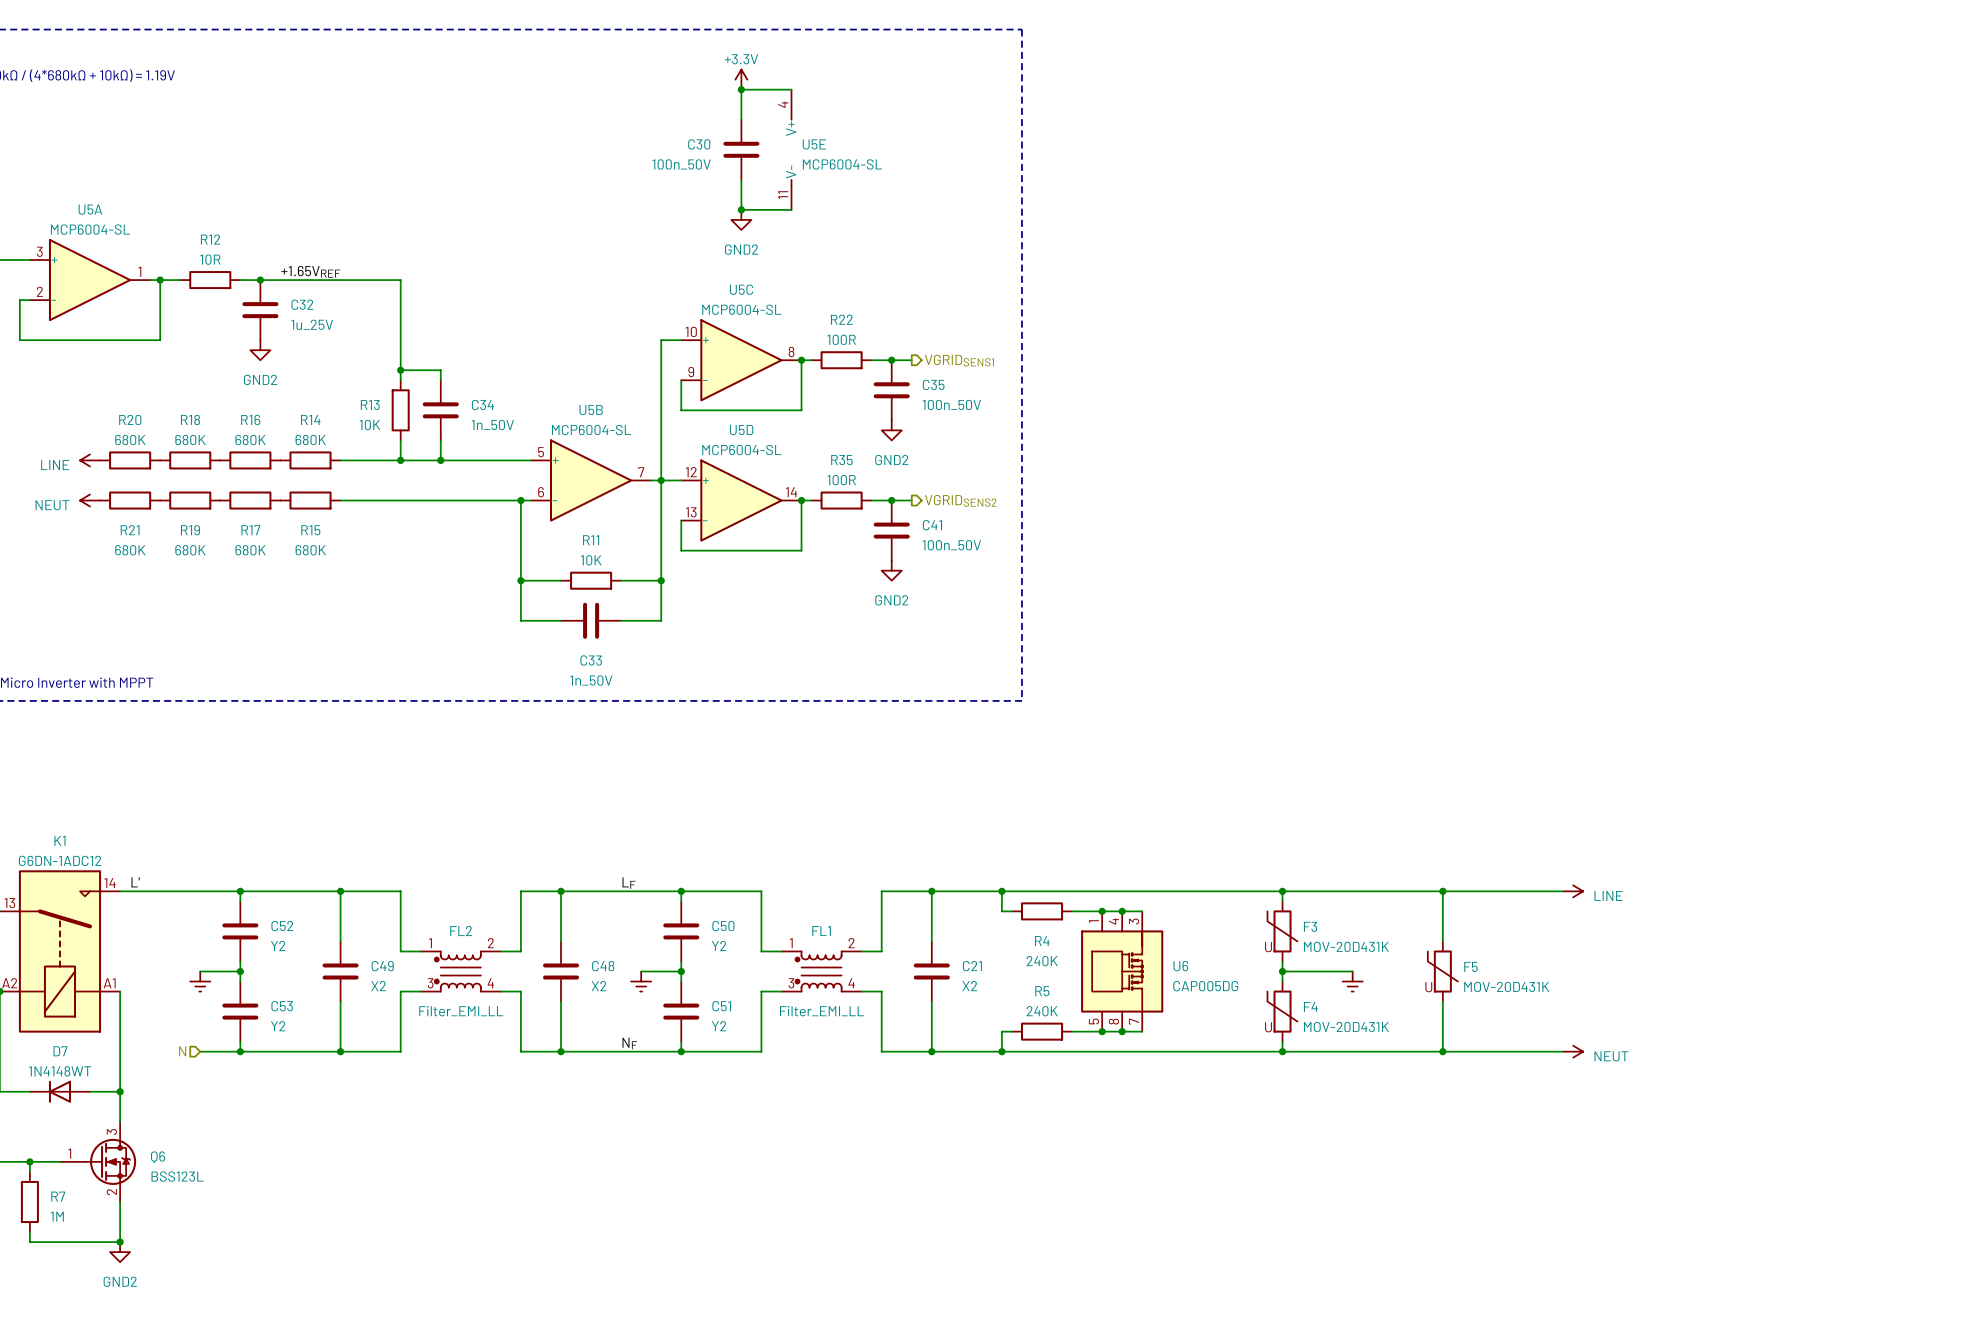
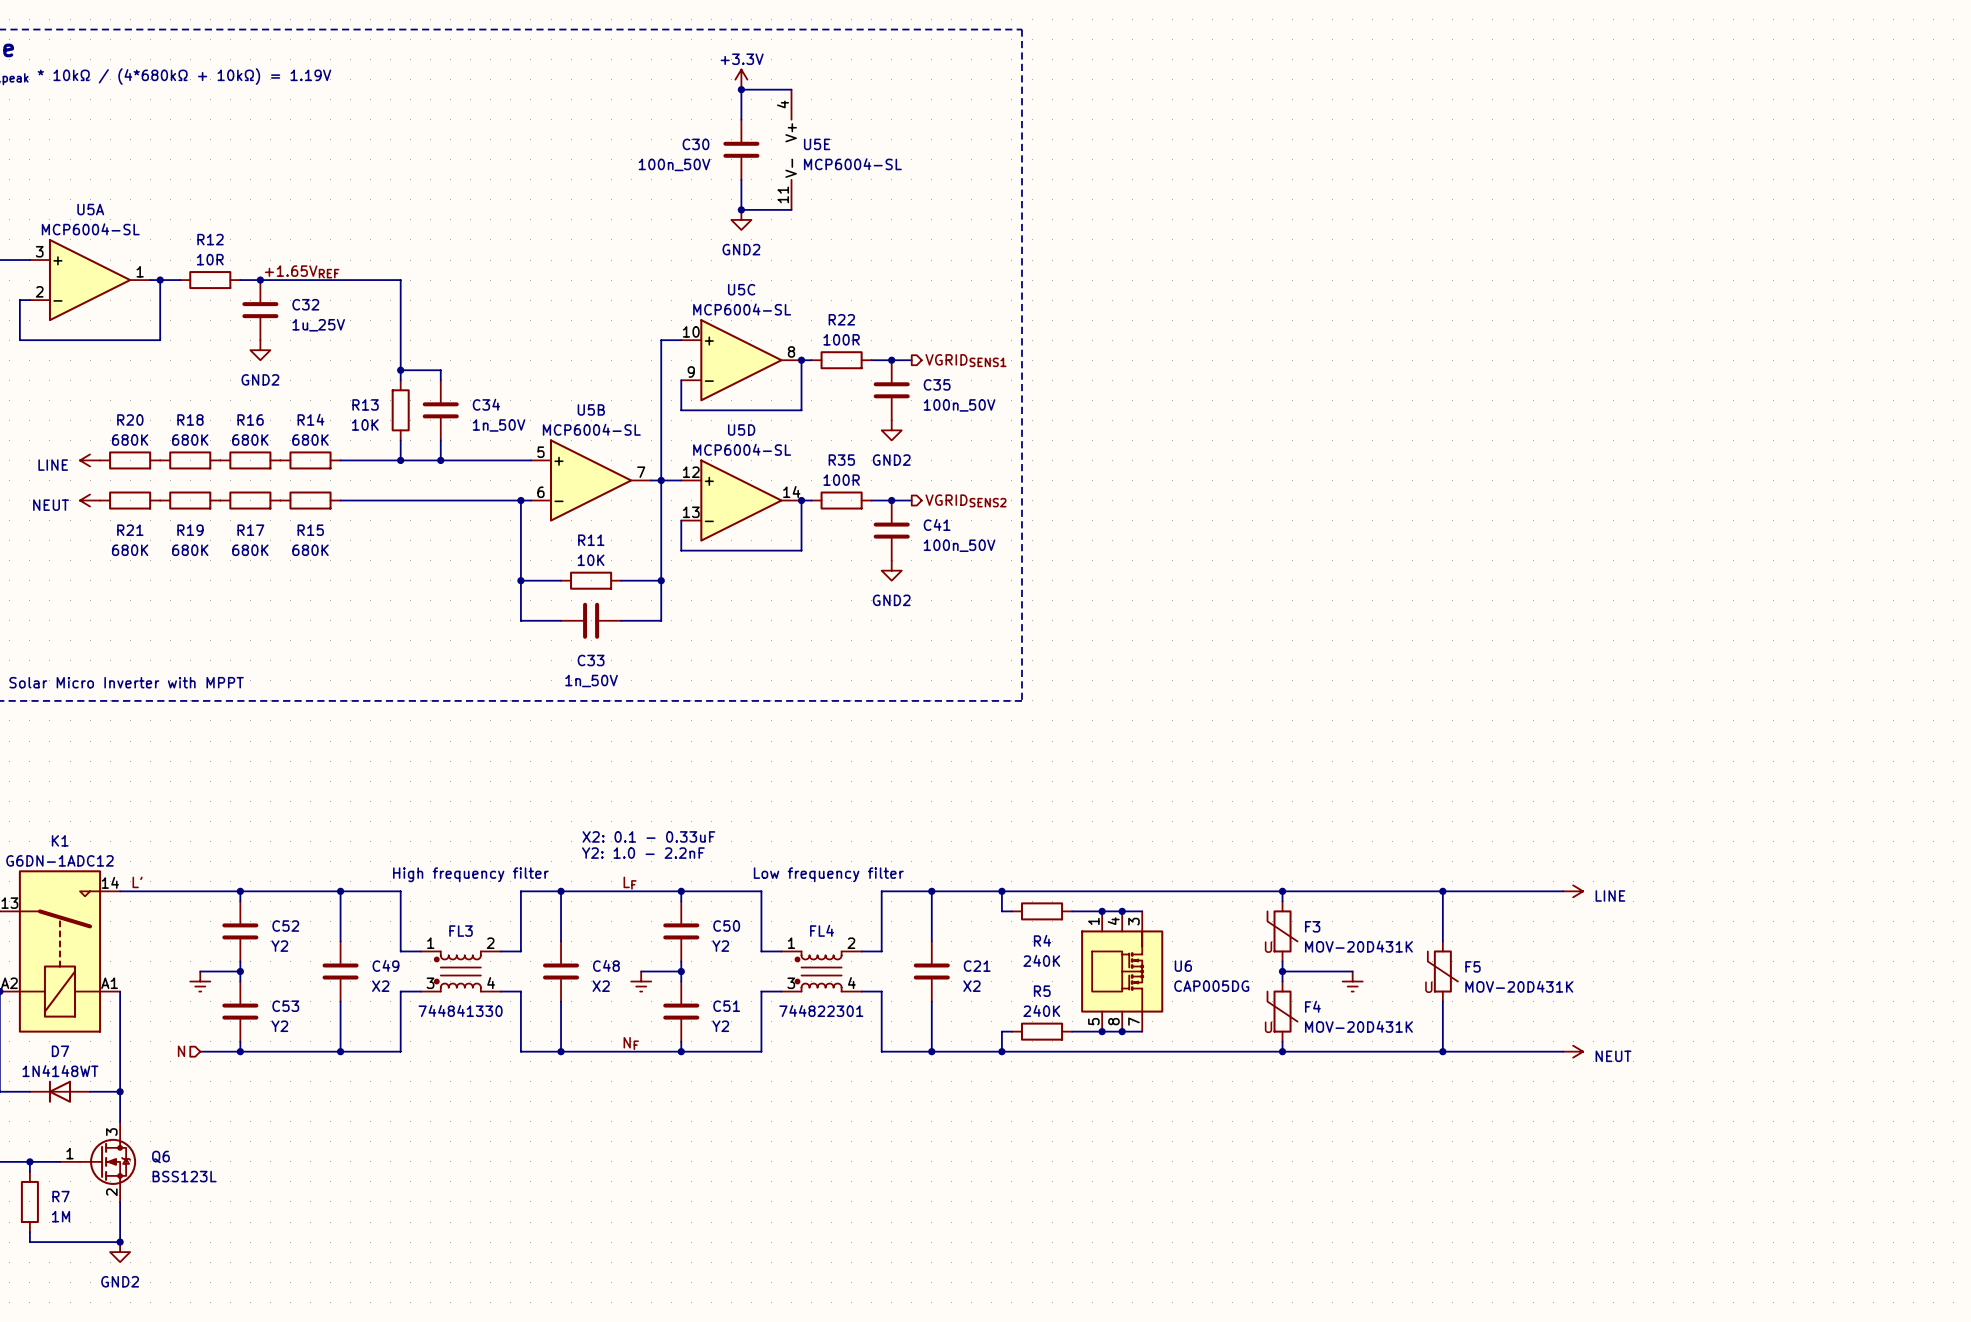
text: none -> X2: 0.1 - 0.33uF (648, 836)
text: none -> Y2: 1.0 - 2.2nF (643, 853)
text: none -> High frequency filter (470, 874)
text: none -> Low frequency filter (828, 874)
FL2 name: FL2 (461, 930) -> FL3 (461, 931)
FL1 name: FL1 (821, 931) -> FL4 (822, 930)
FL2 value: Filter_EMI_LL (461, 1011) -> 744841330 (460, 1010)
FL1 value: Filter_EMI_LL (821, 1011) -> 744822301 (821, 1010)

